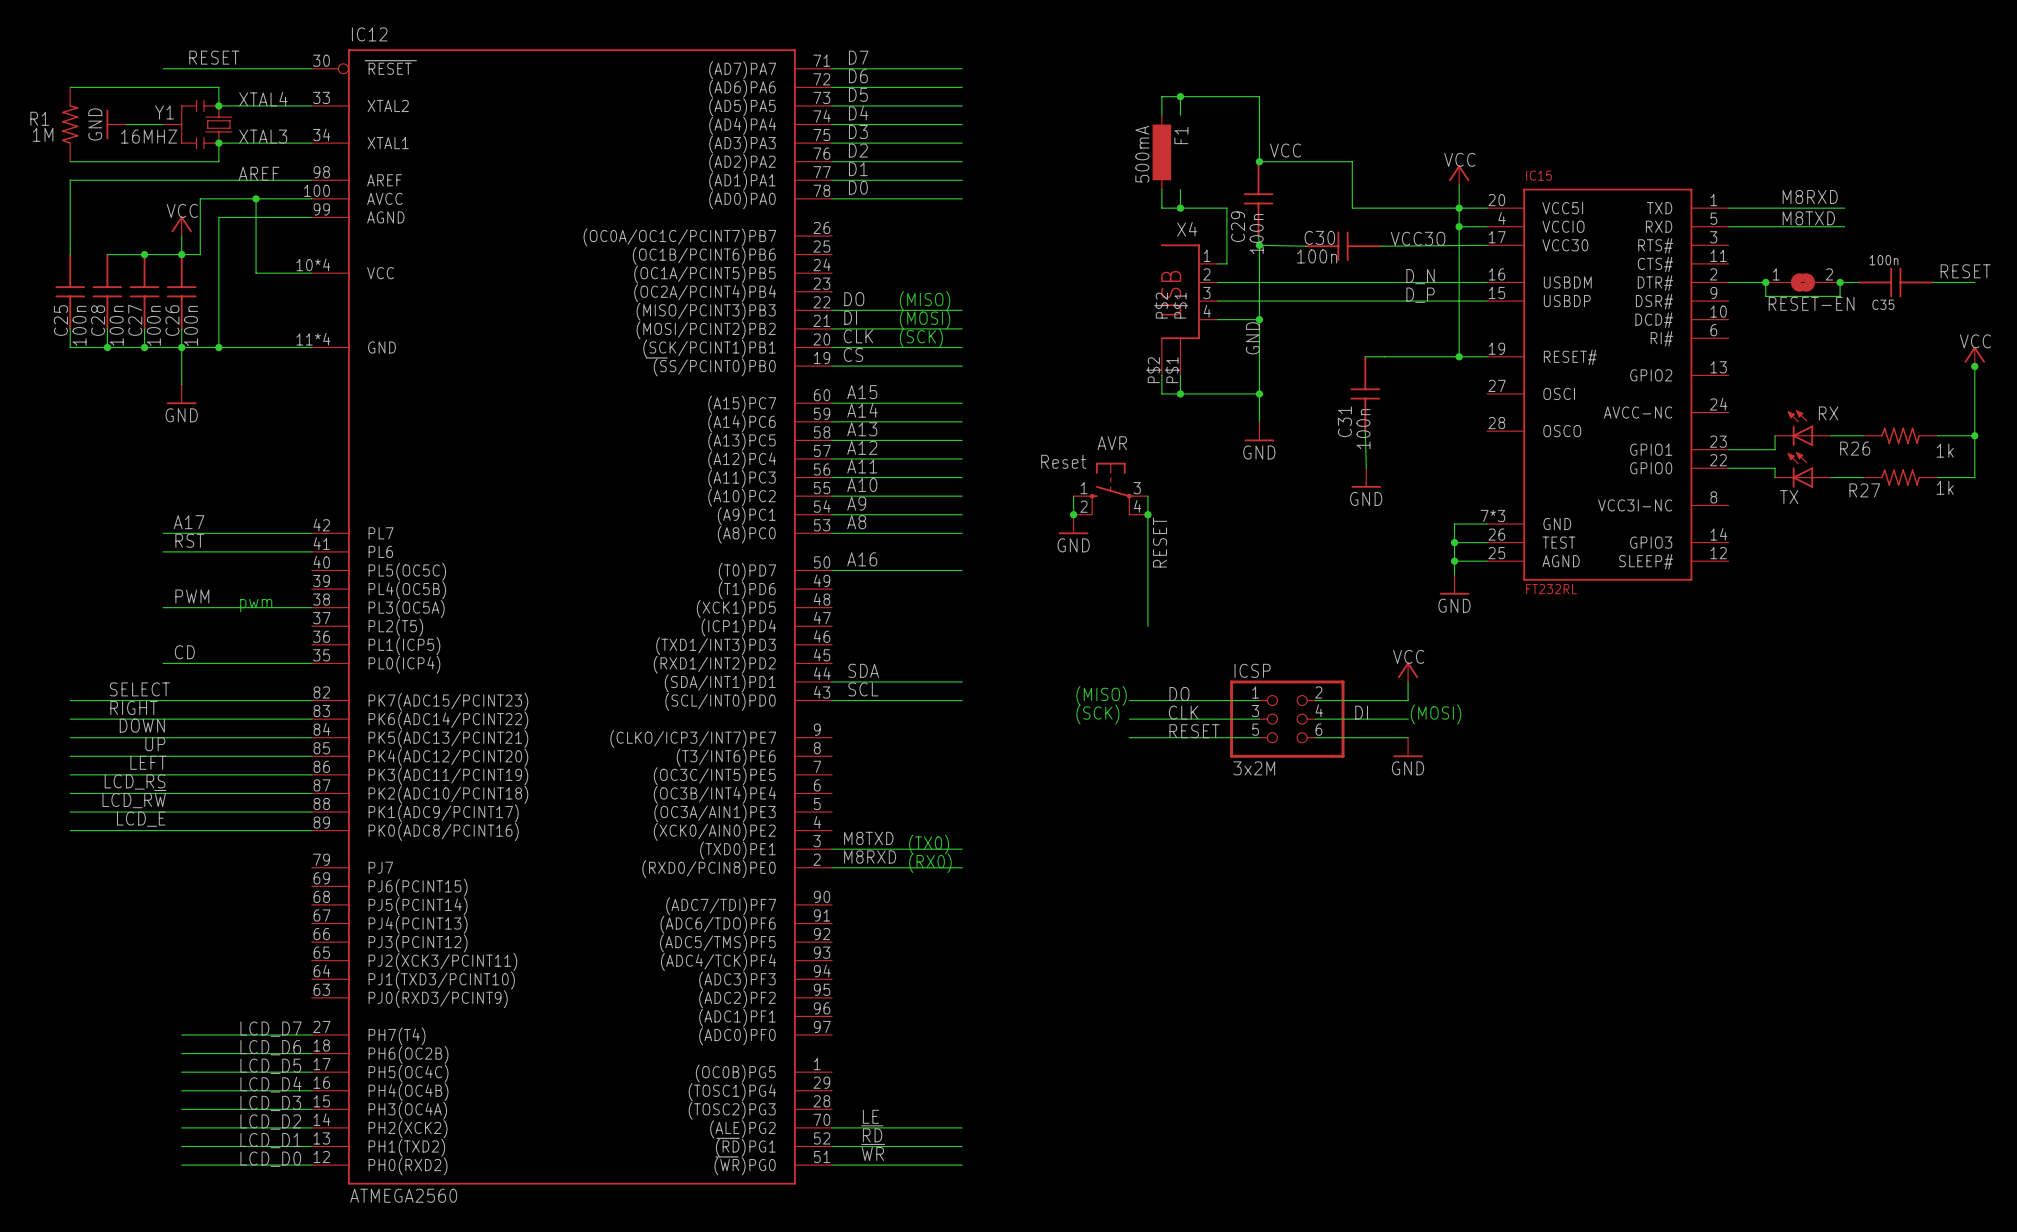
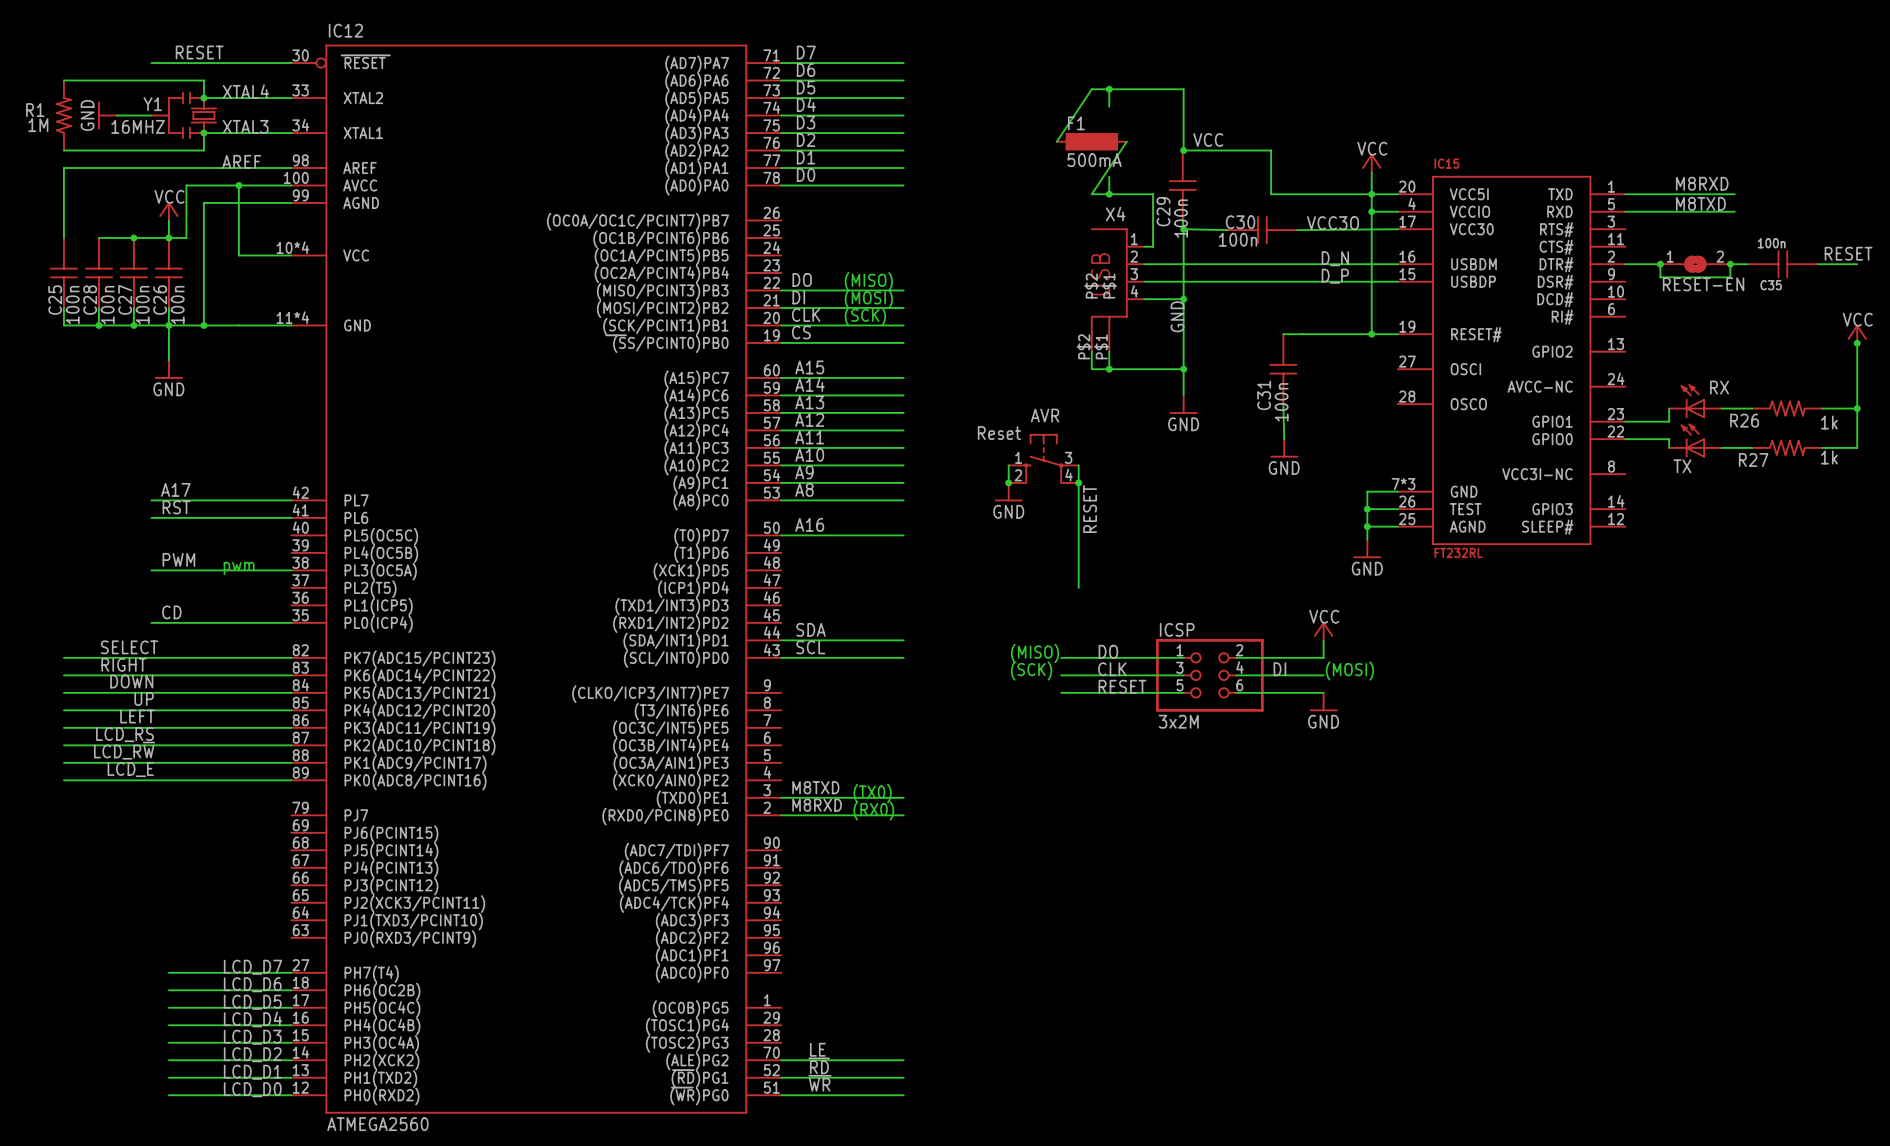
wire: (1161, 96) (1161, 115) -> (1091, 89) (1056, 141)
F1 name position: F1 (1181, 135) -> F1 (1076, 123)
F1 rotation: 0° (1161, 152) -> 90° clockwise (1091, 141)
F1 value position: 500mA (1142, 154) -> 500mA (1094, 160)
wire: (1161, 189) (1161, 208) -> (1126, 141) (1091, 194)

